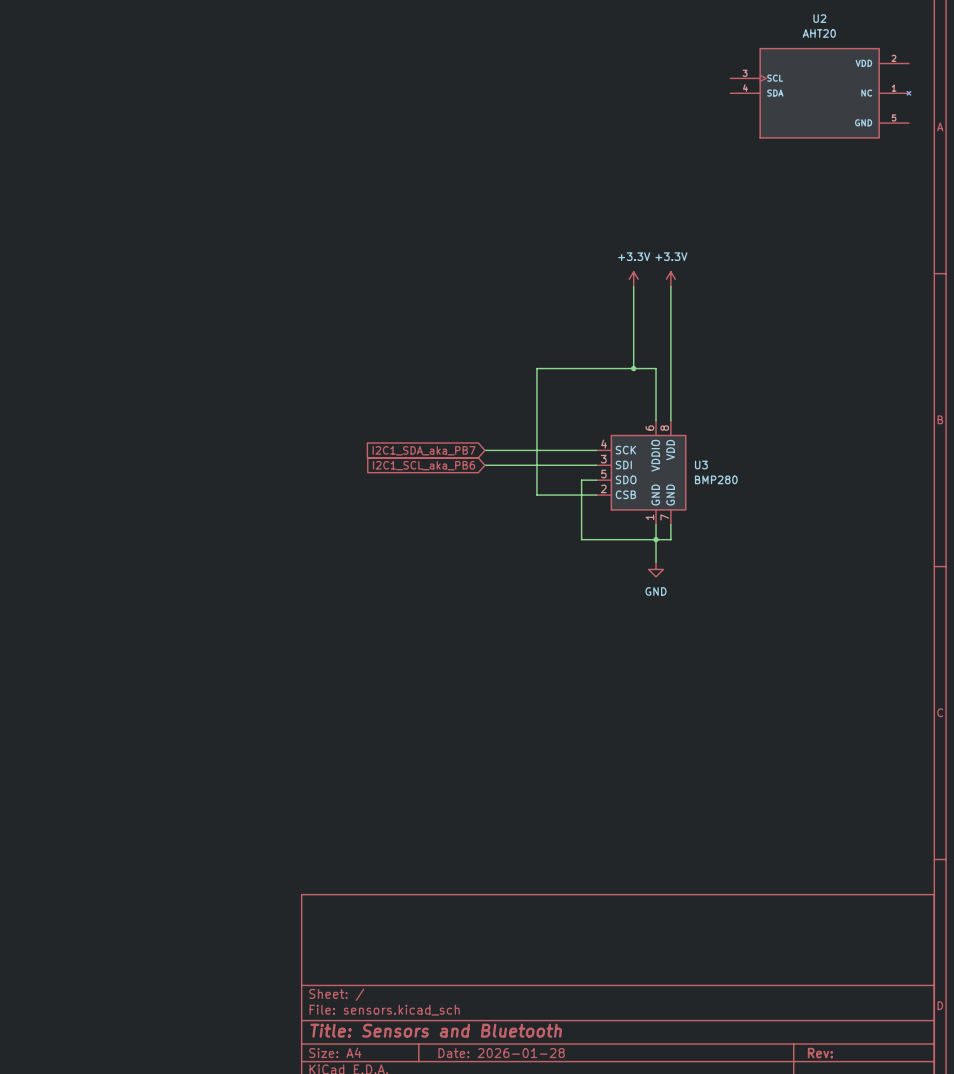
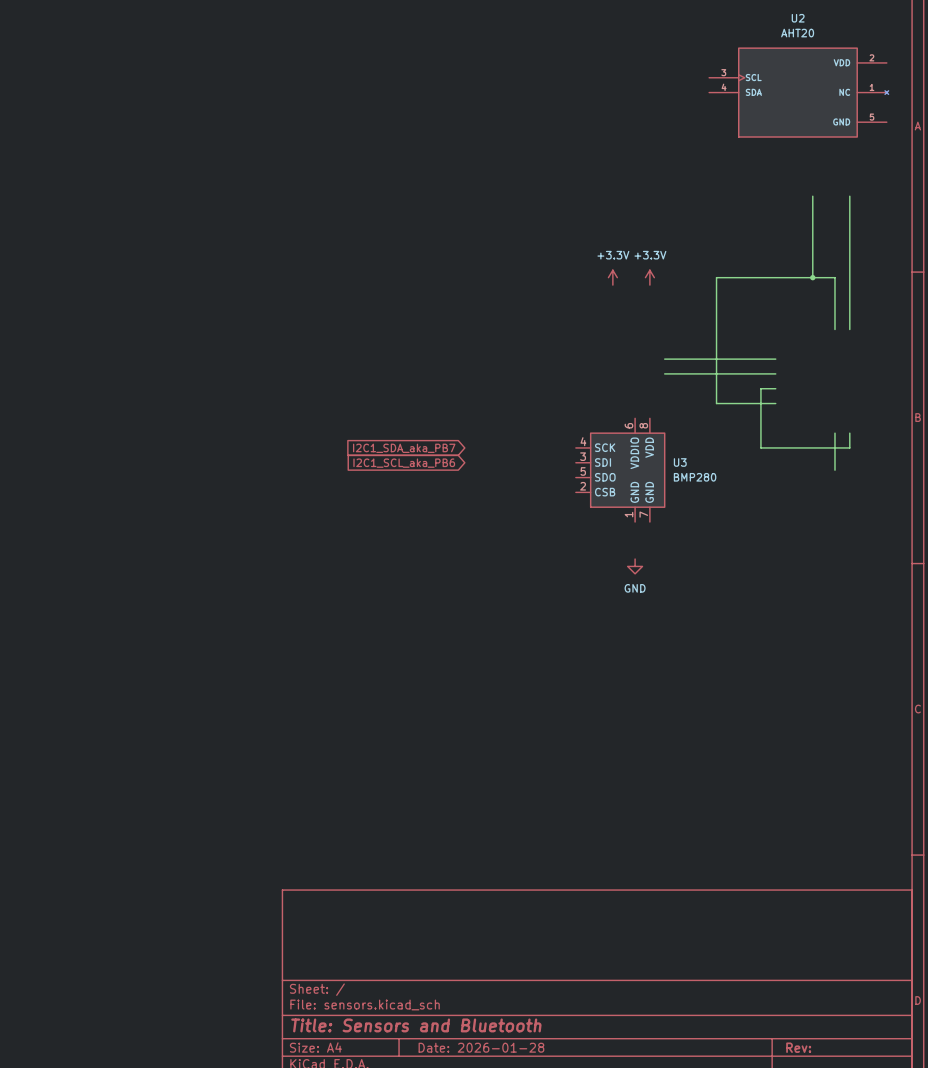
wire: none -> (812, 196) (812, 277)
wire: none -> (849, 196) (849, 329)
junction: none -> (812, 277)
wire: (633, 286) (633, 368) -> none
wire: (670, 286) (670, 420) -> none
wire: none -> (834, 329) (834, 277) (716, 277) (716, 403) (775, 403)
wire: none -> (664, 359) (775, 359)
junction: (633, 368) -> none
wire: none -> (664, 373) (775, 373)
wire: none -> (775, 388) (760, 388) (760, 447) (849, 447) (849, 433)
wire: (656, 420) (656, 368) (536, 368) (536, 495) (596, 495) -> none
wire: none -> (834, 433) (834, 470)
wire: (484, 450) (596, 450) -> none
wire: (484, 465) (596, 465) -> none
wire: (596, 480) (581, 480) (581, 539) (670, 539) (670, 524) -> none
wire: (656, 524) (656, 562) -> none
junction: (656, 539) -> none

